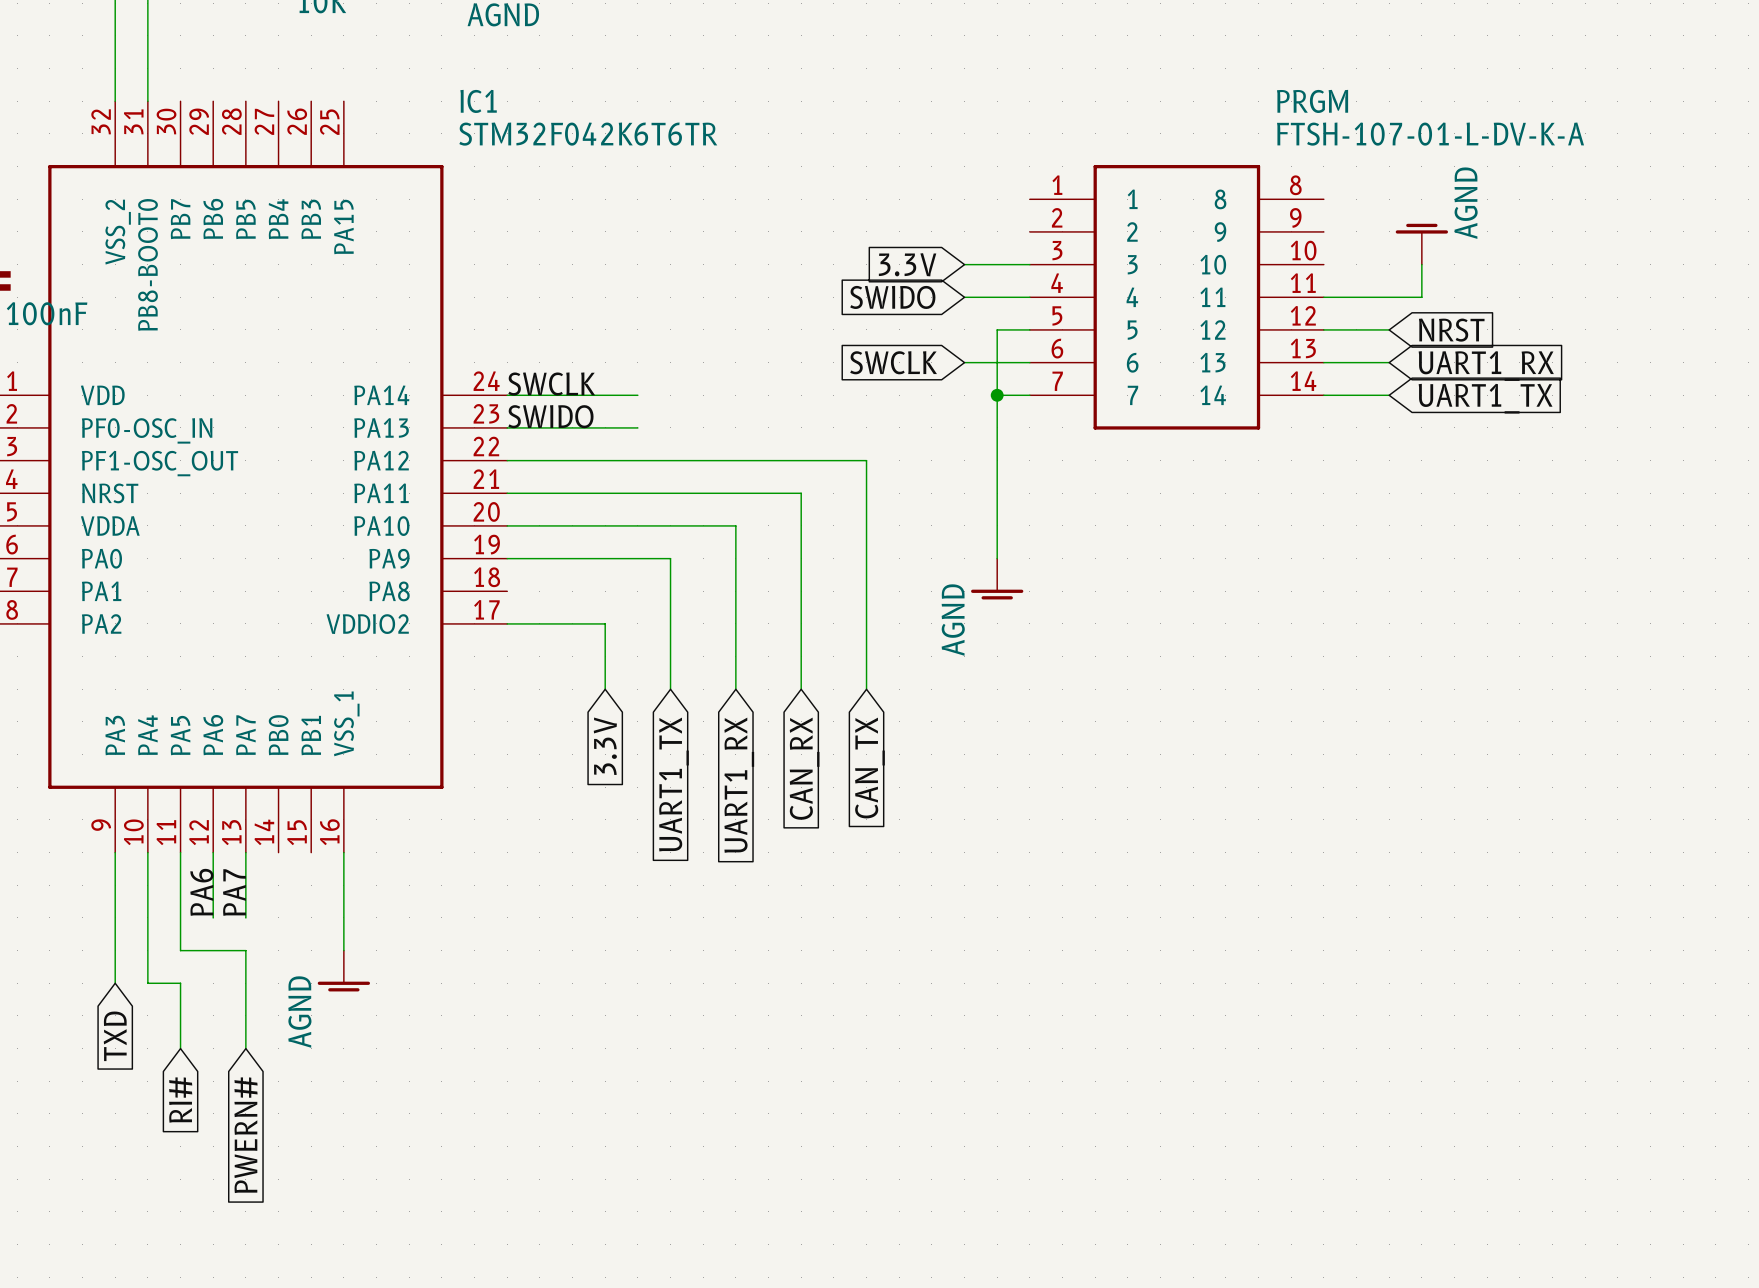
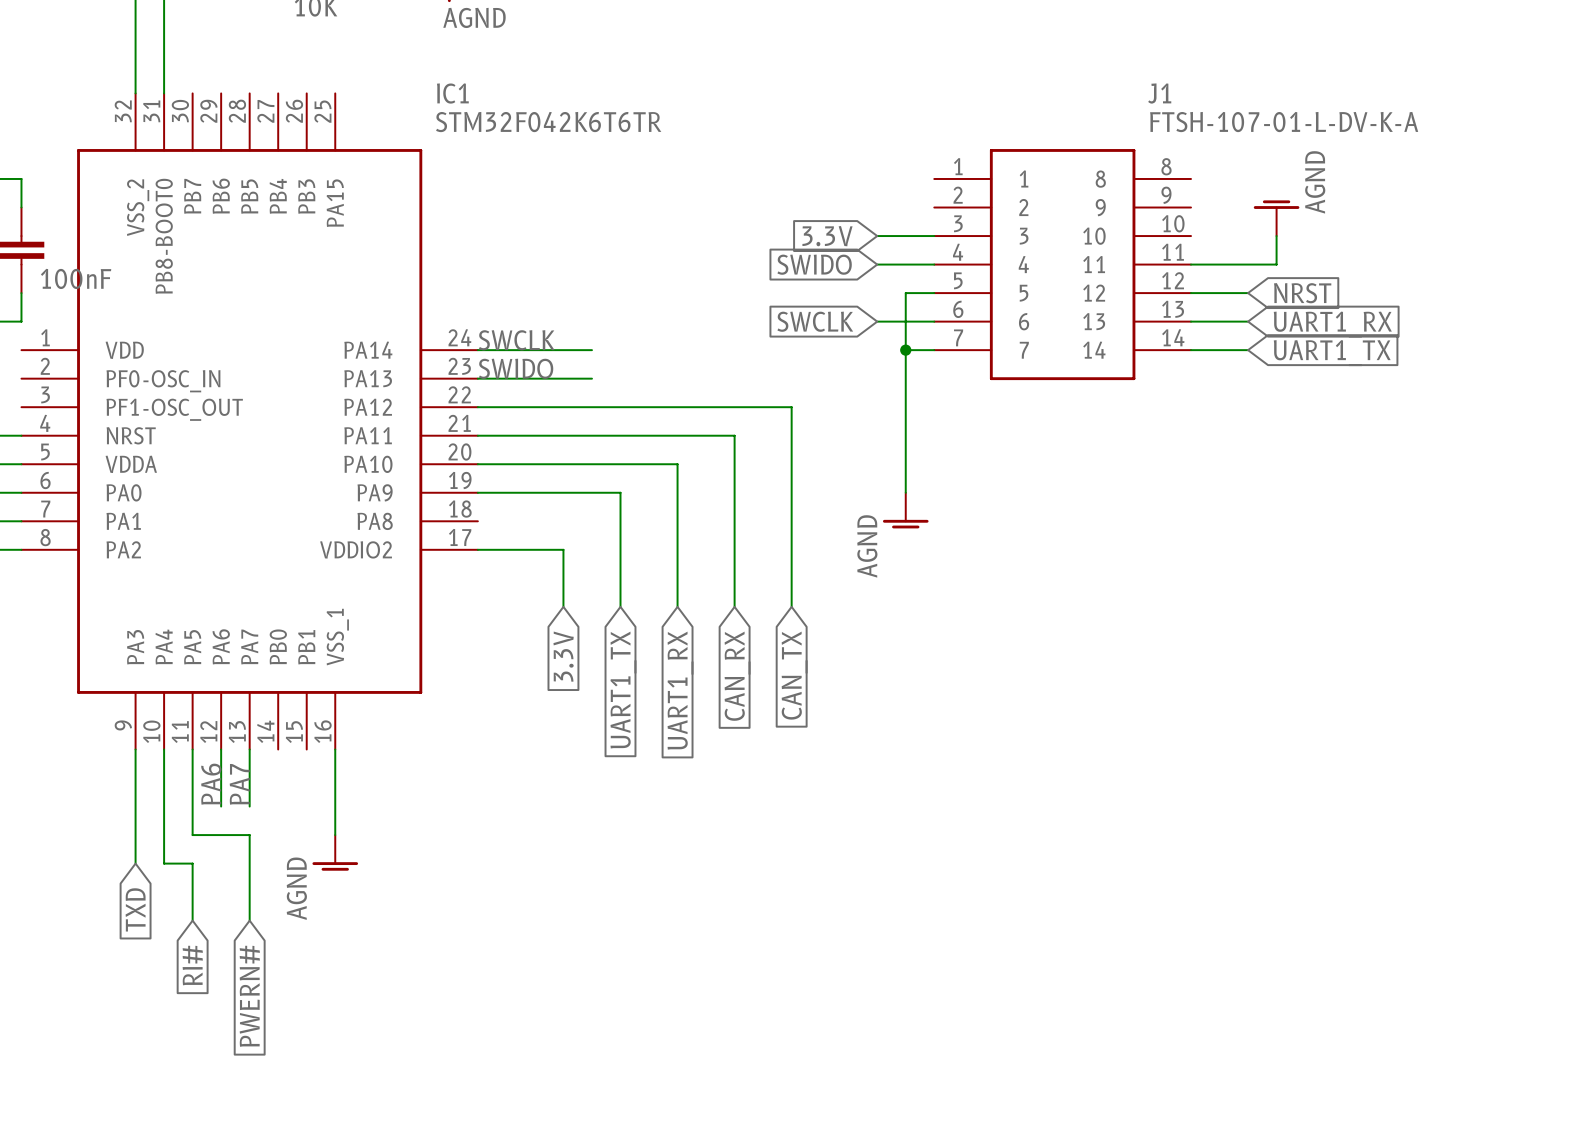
PRGM name: PRGM (1312, 101) -> J1 (1159, 93)

